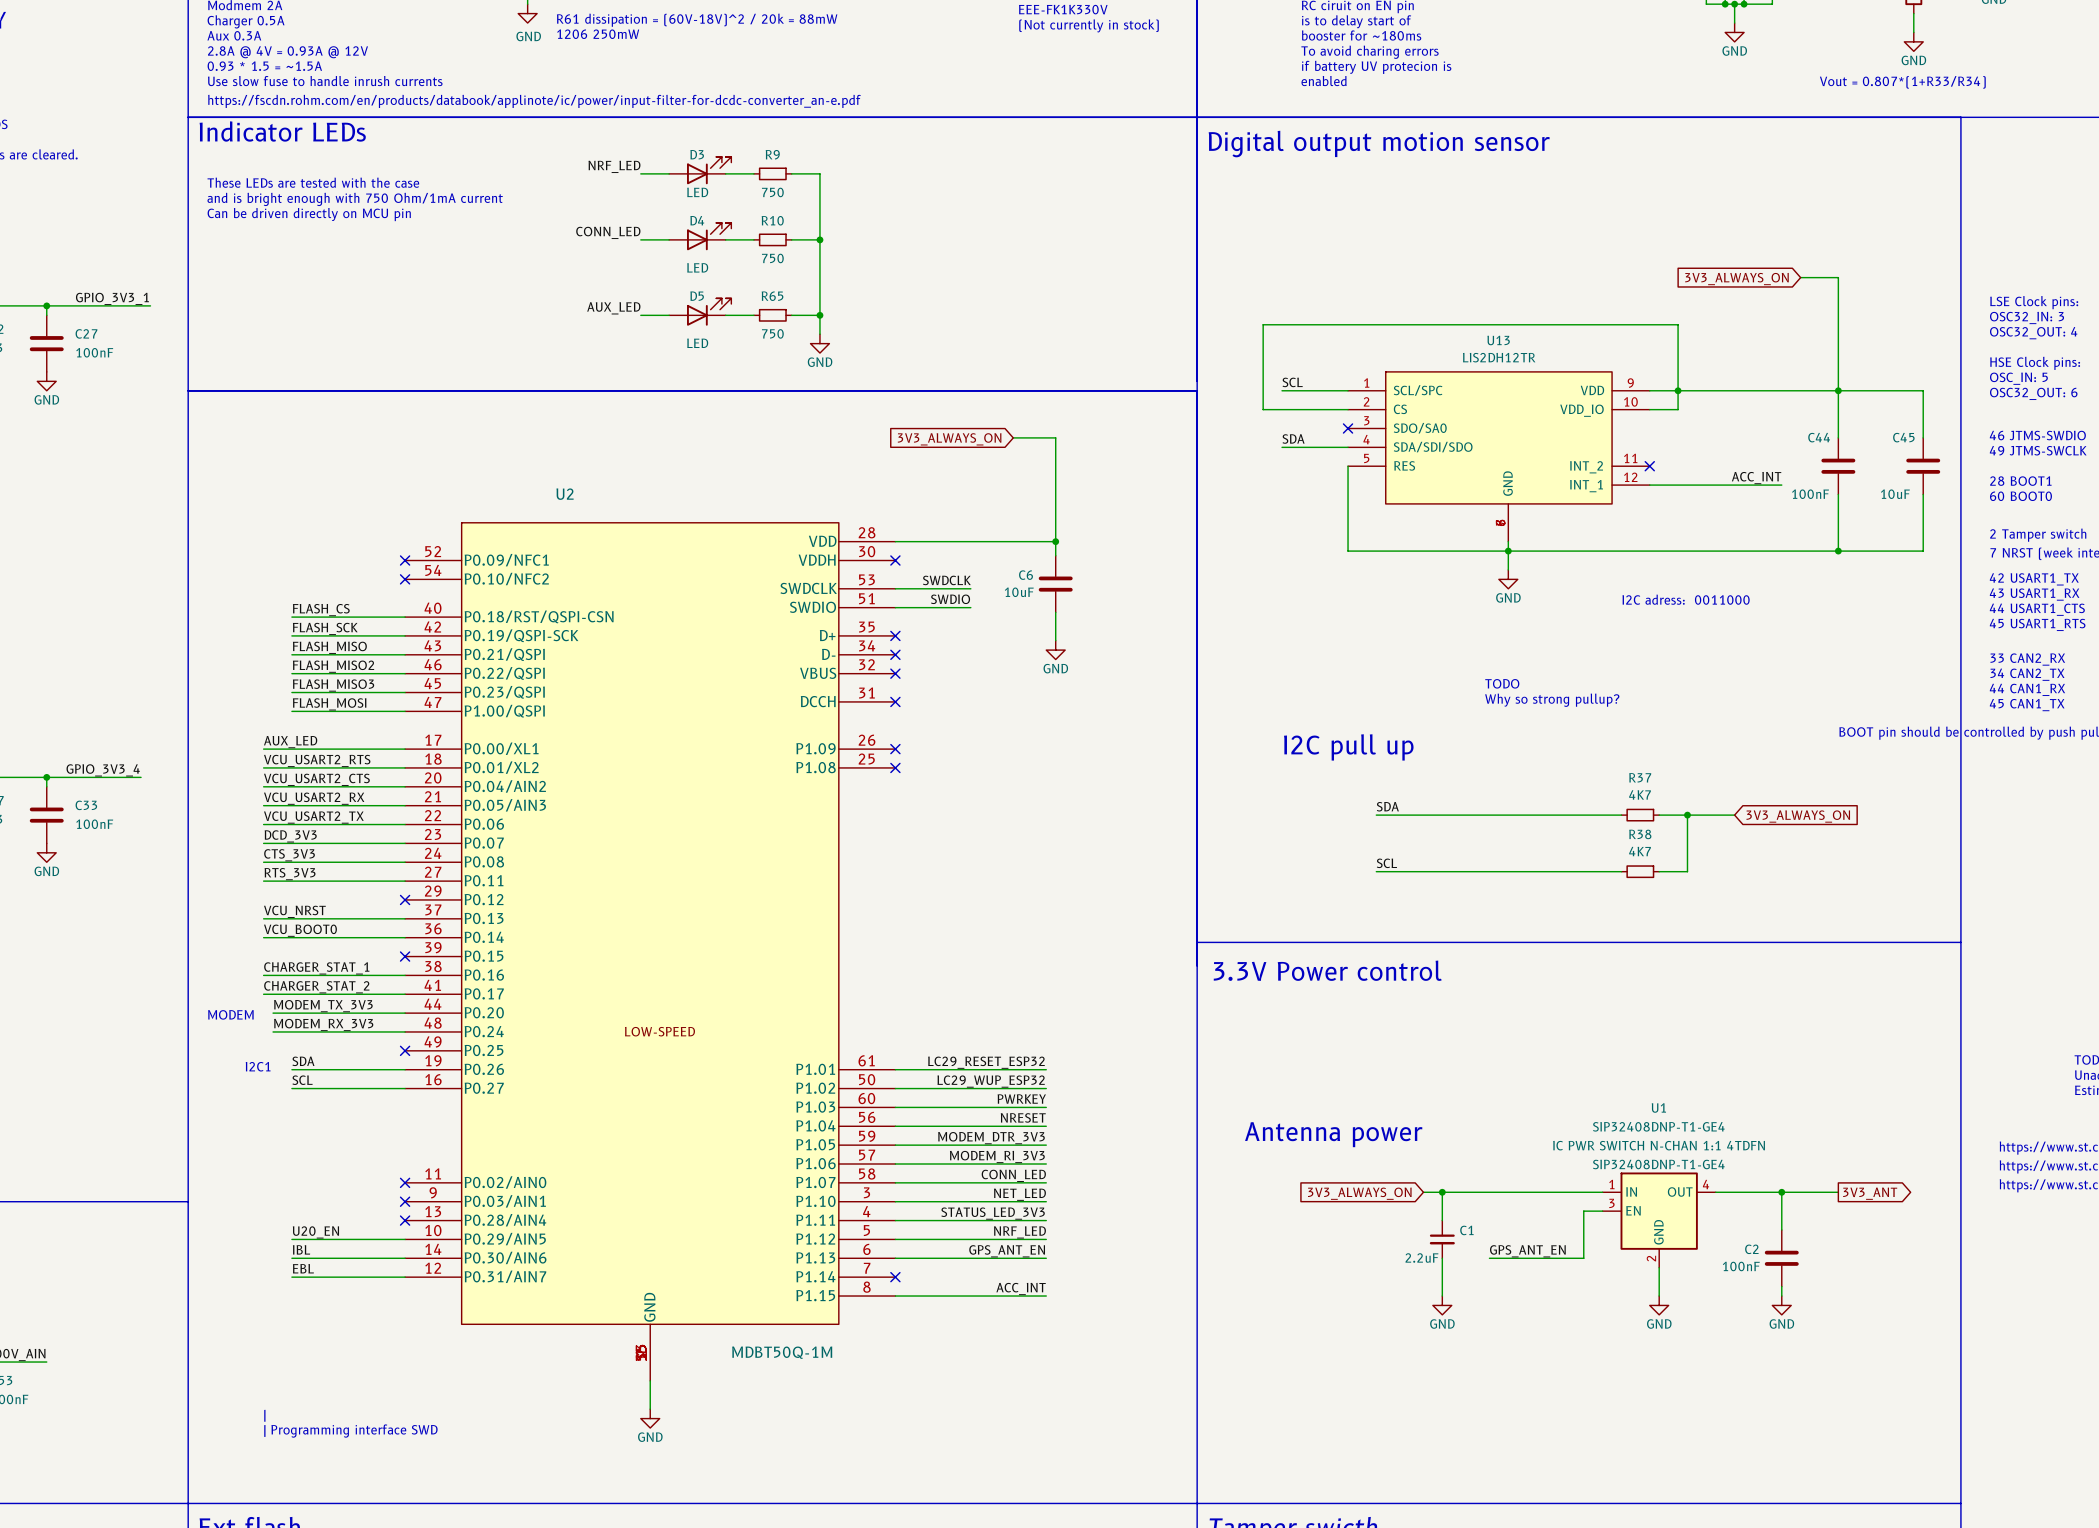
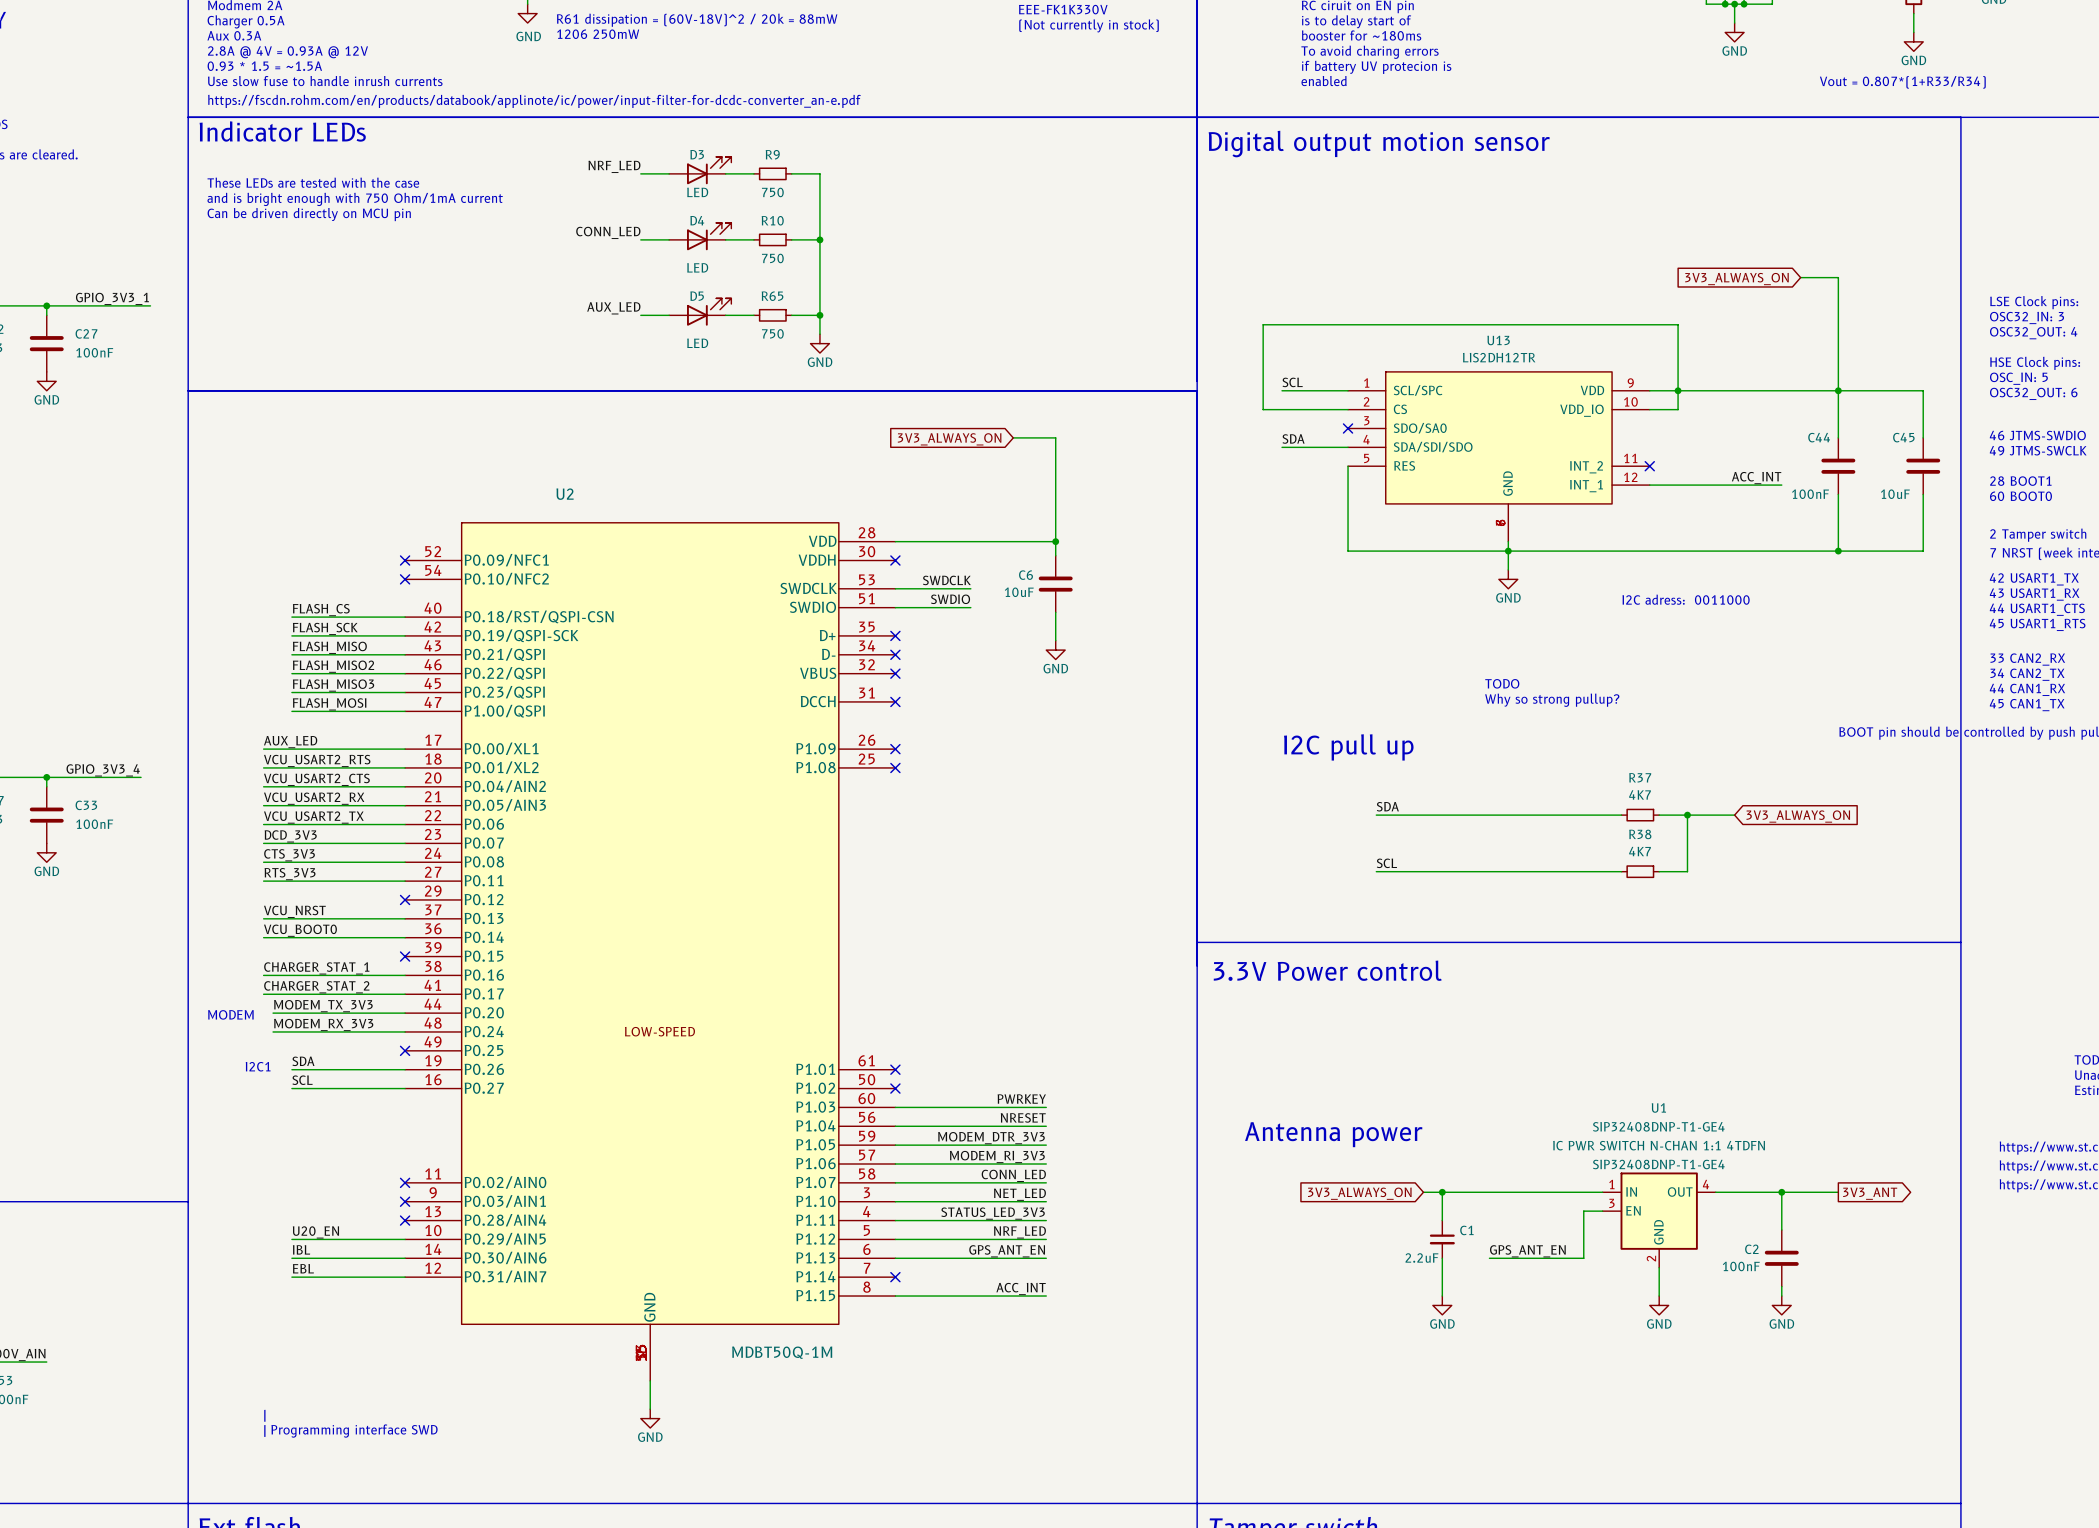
label: LC29_RESET_ESP32 (986, 1062) -> none
wire: (895, 1069) (1046, 1069) -> none
no-connect mark: none -> (895, 1069)
label: LC29_WUP_ESP32 (991, 1081) -> none
wire: (895, 1088) (1046, 1088) -> none
no-connect mark: none -> (895, 1088)

